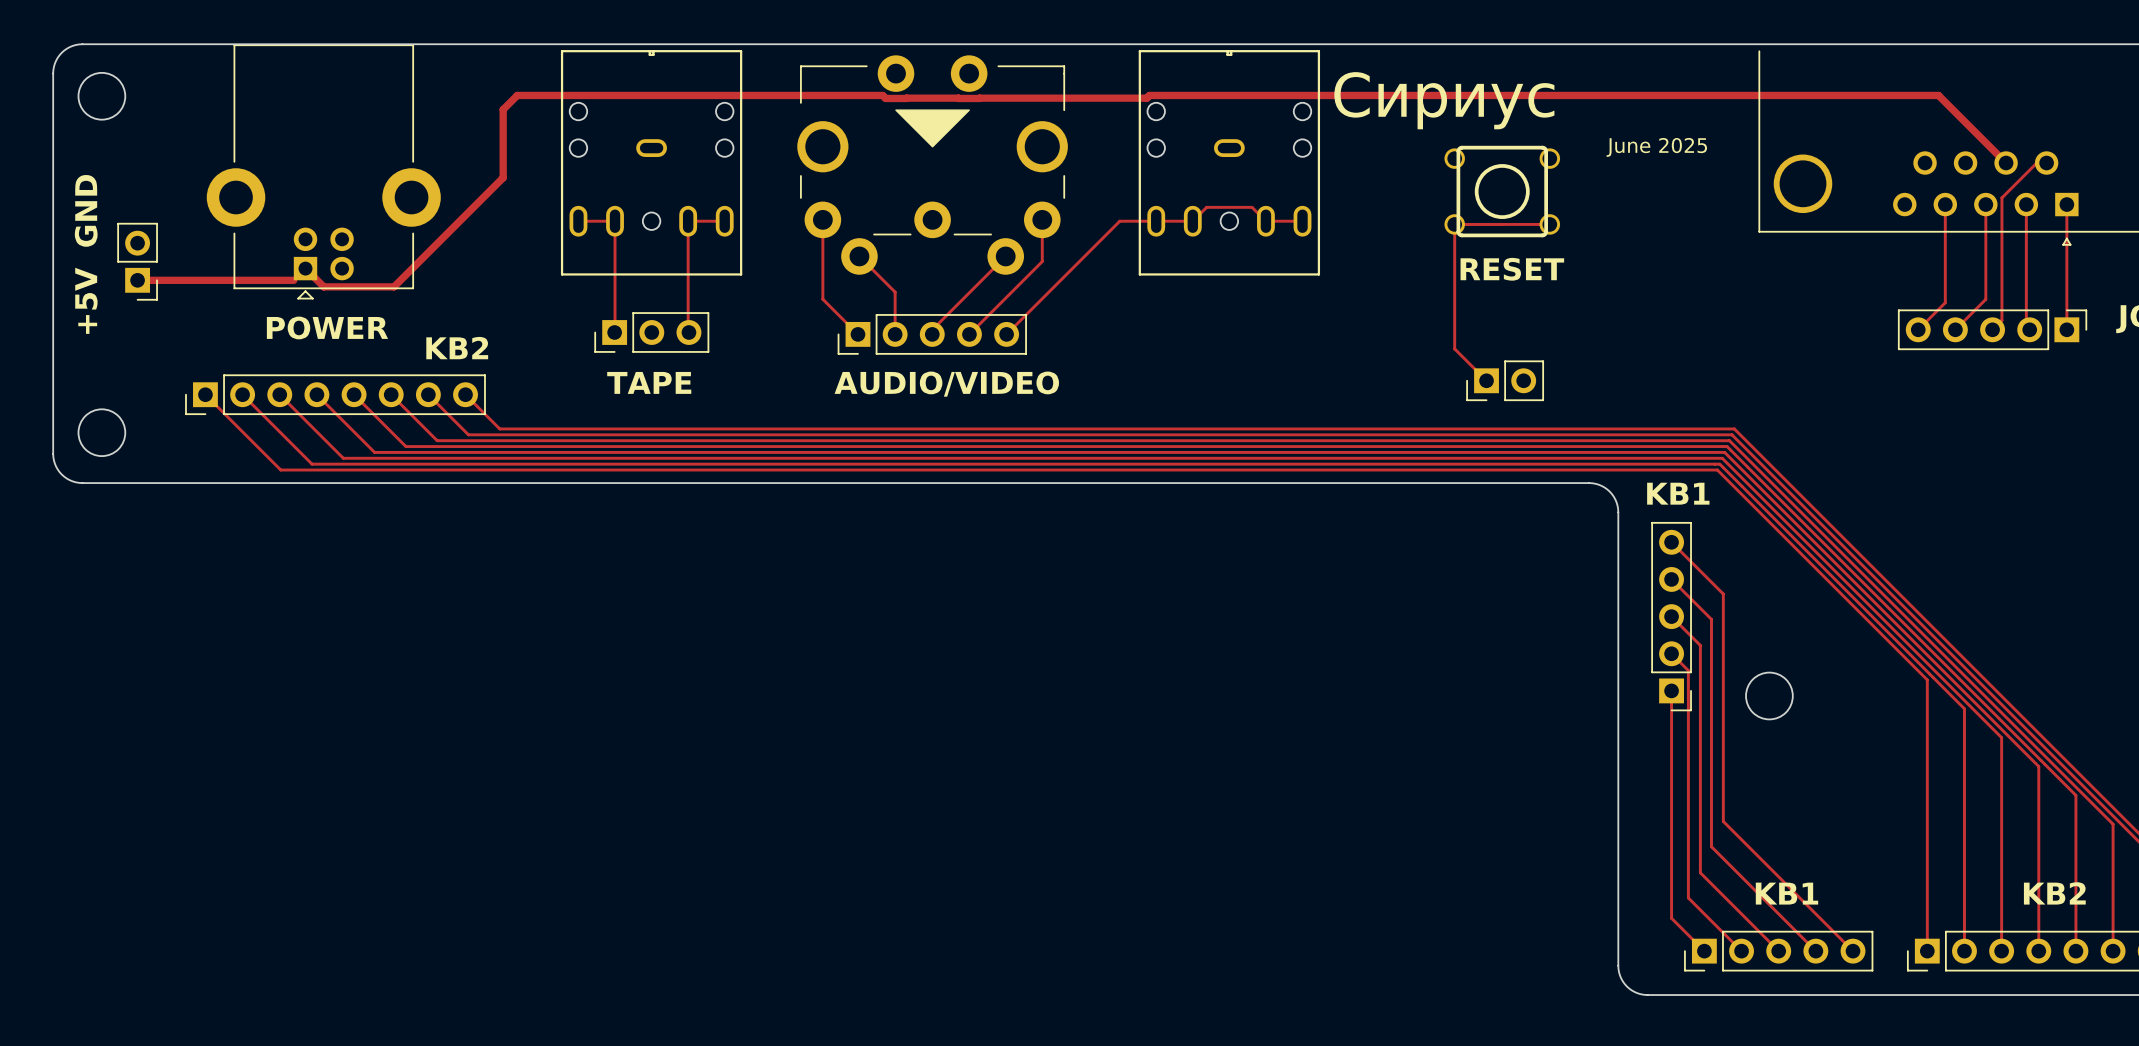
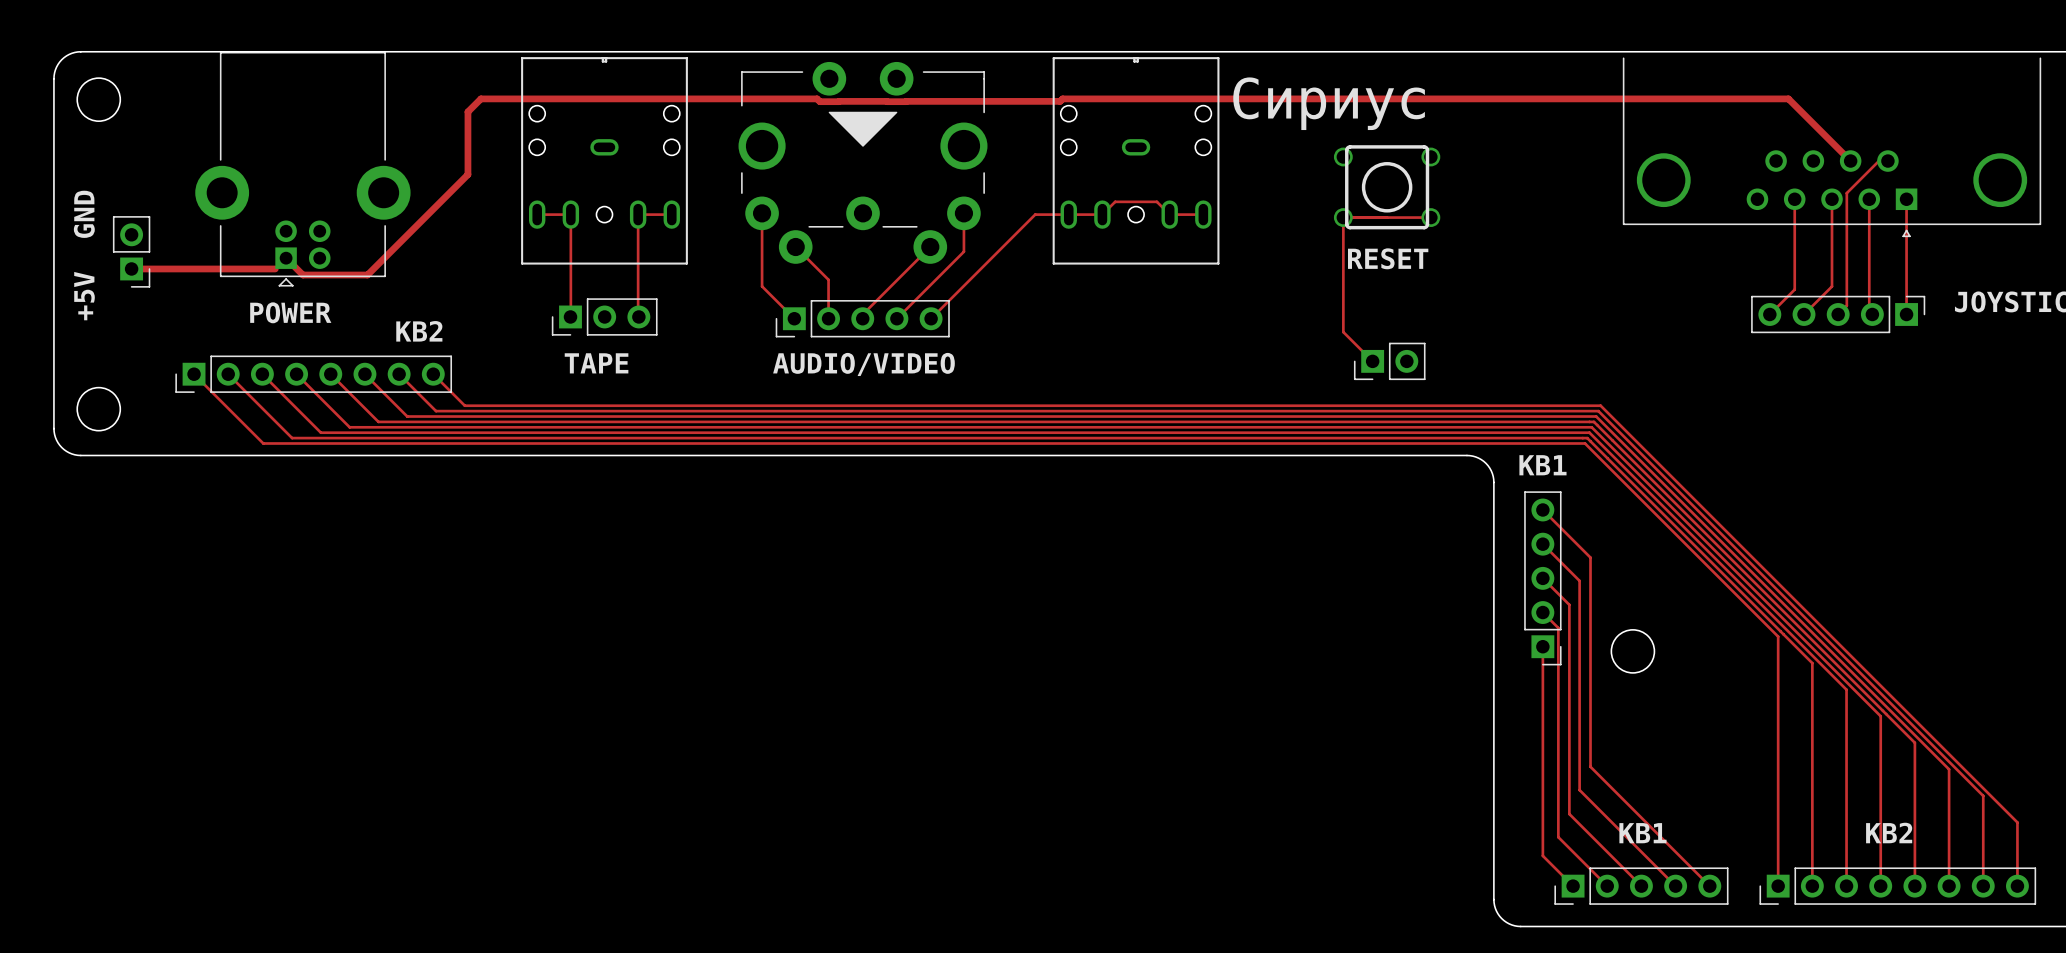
text: June 2025 (1656, 147) -> none

